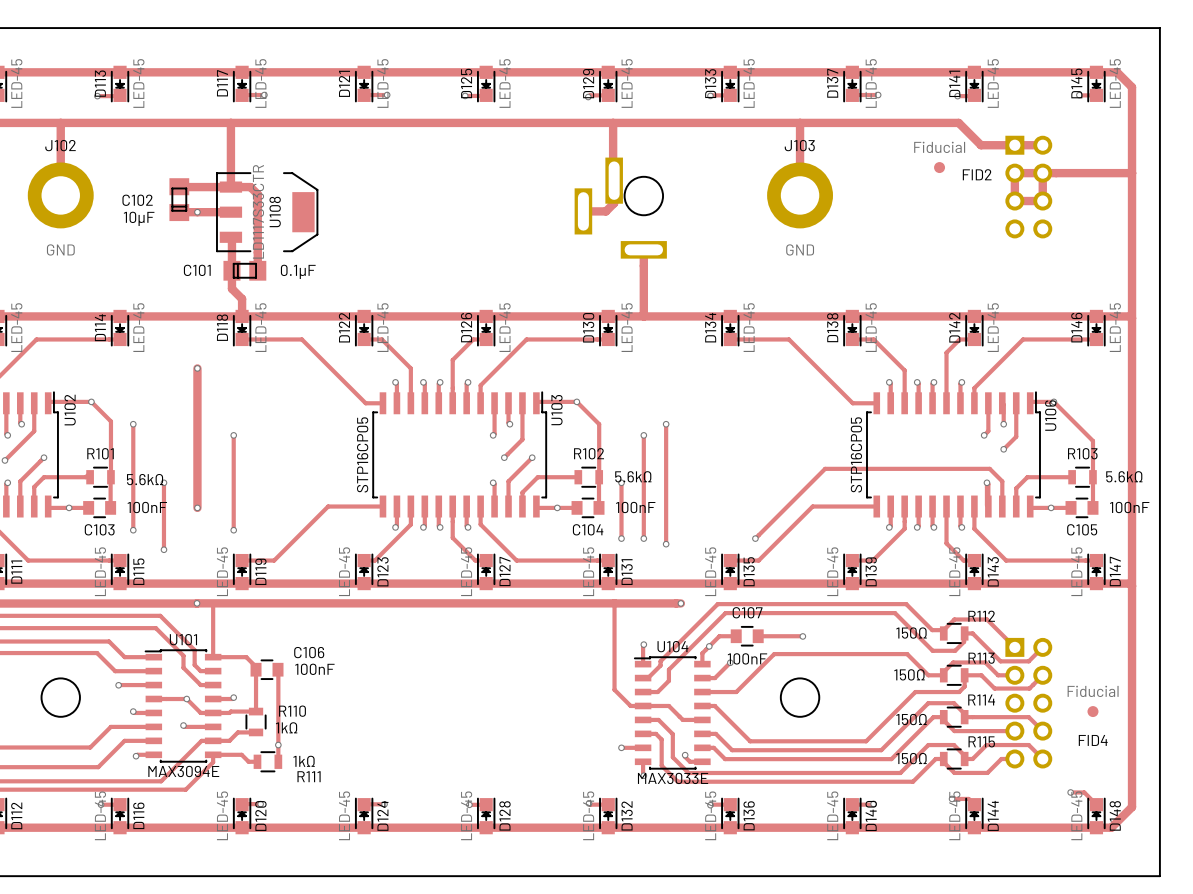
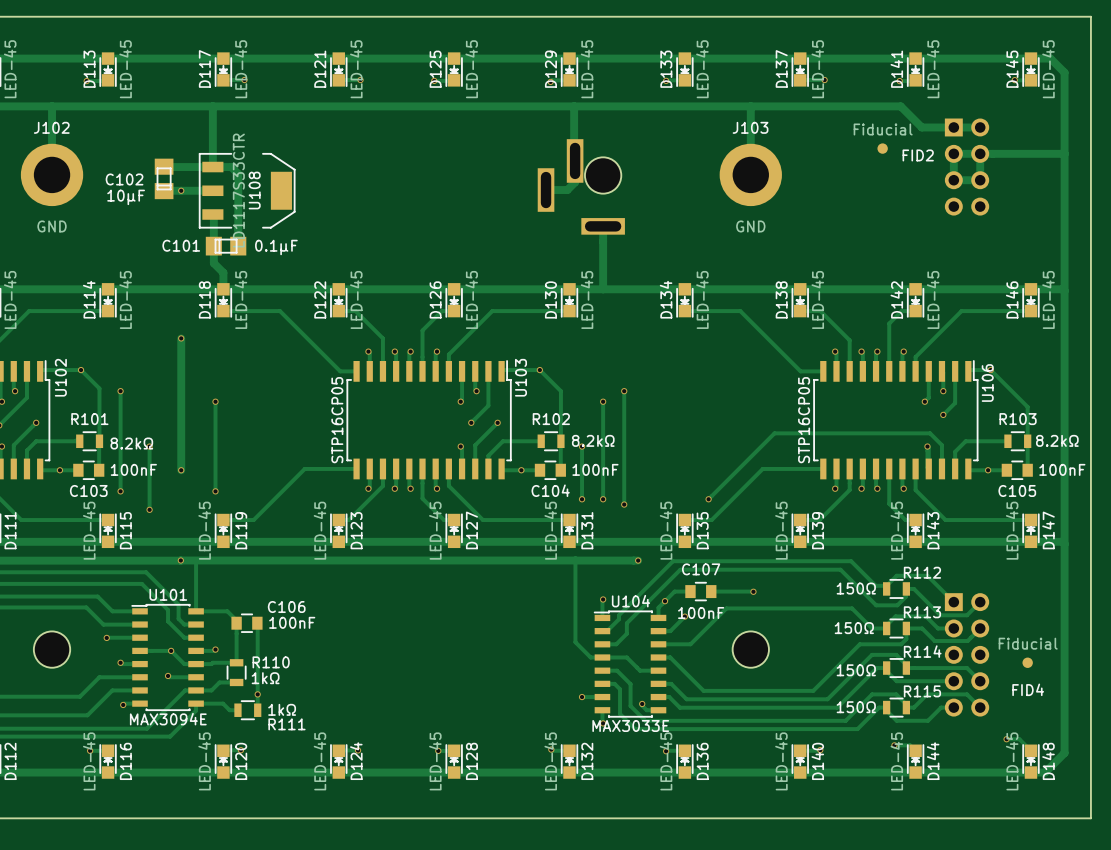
R102 value: 5.6kΩ (633, 476) -> 8.2kΩ (593, 440)
R103 value: 5.6kΩ (1124, 476) -> 8.2kΩ (1057, 440)
R101 value: 5.6kΩ (145, 479) -> 8.2kΩ (131, 443)

